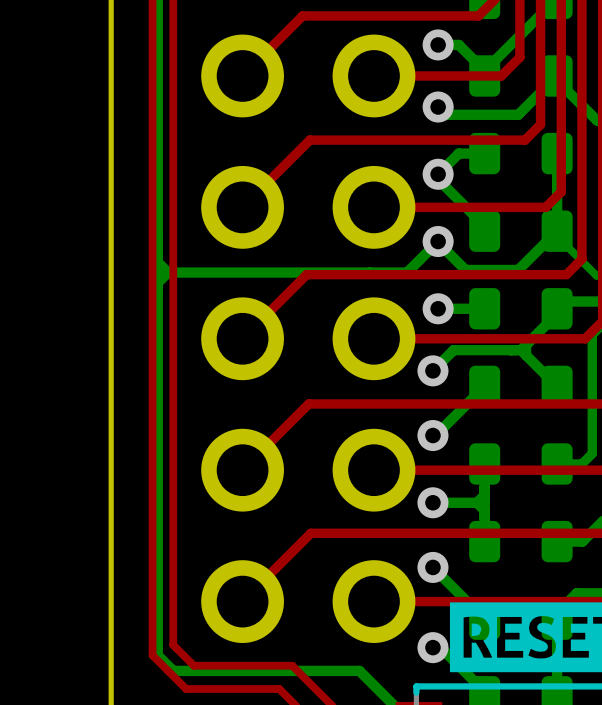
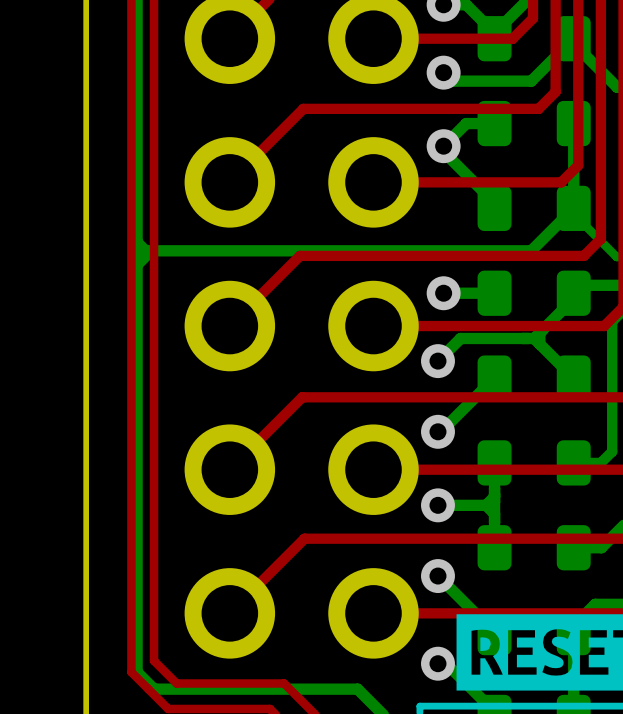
bottom track: (438, 241) (407, 272) (168, 272) -> none
via: (438, 241) -> none
bottom track: (438, 242) (465, 269) -> (148, 250) (473, 250)

